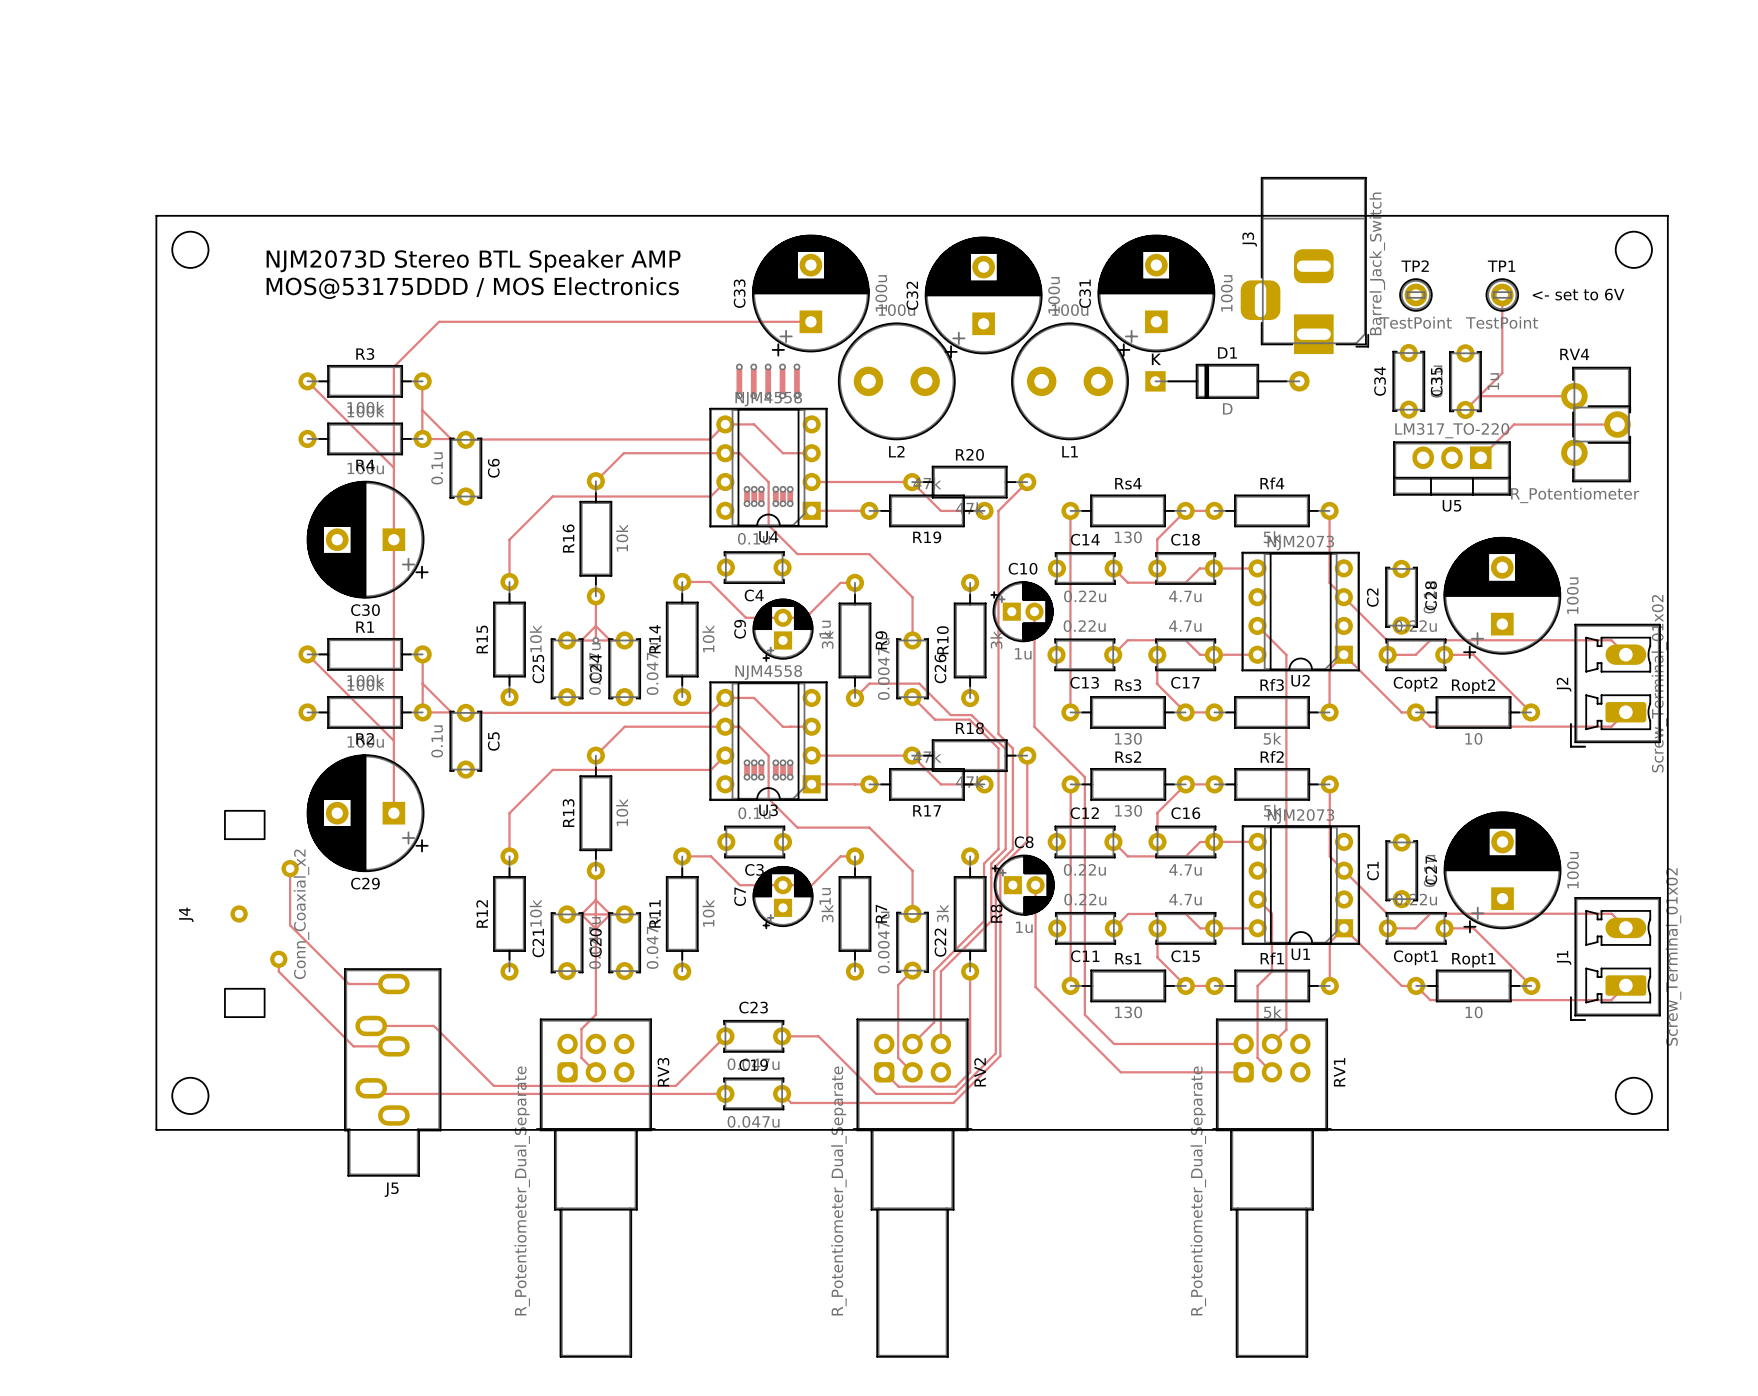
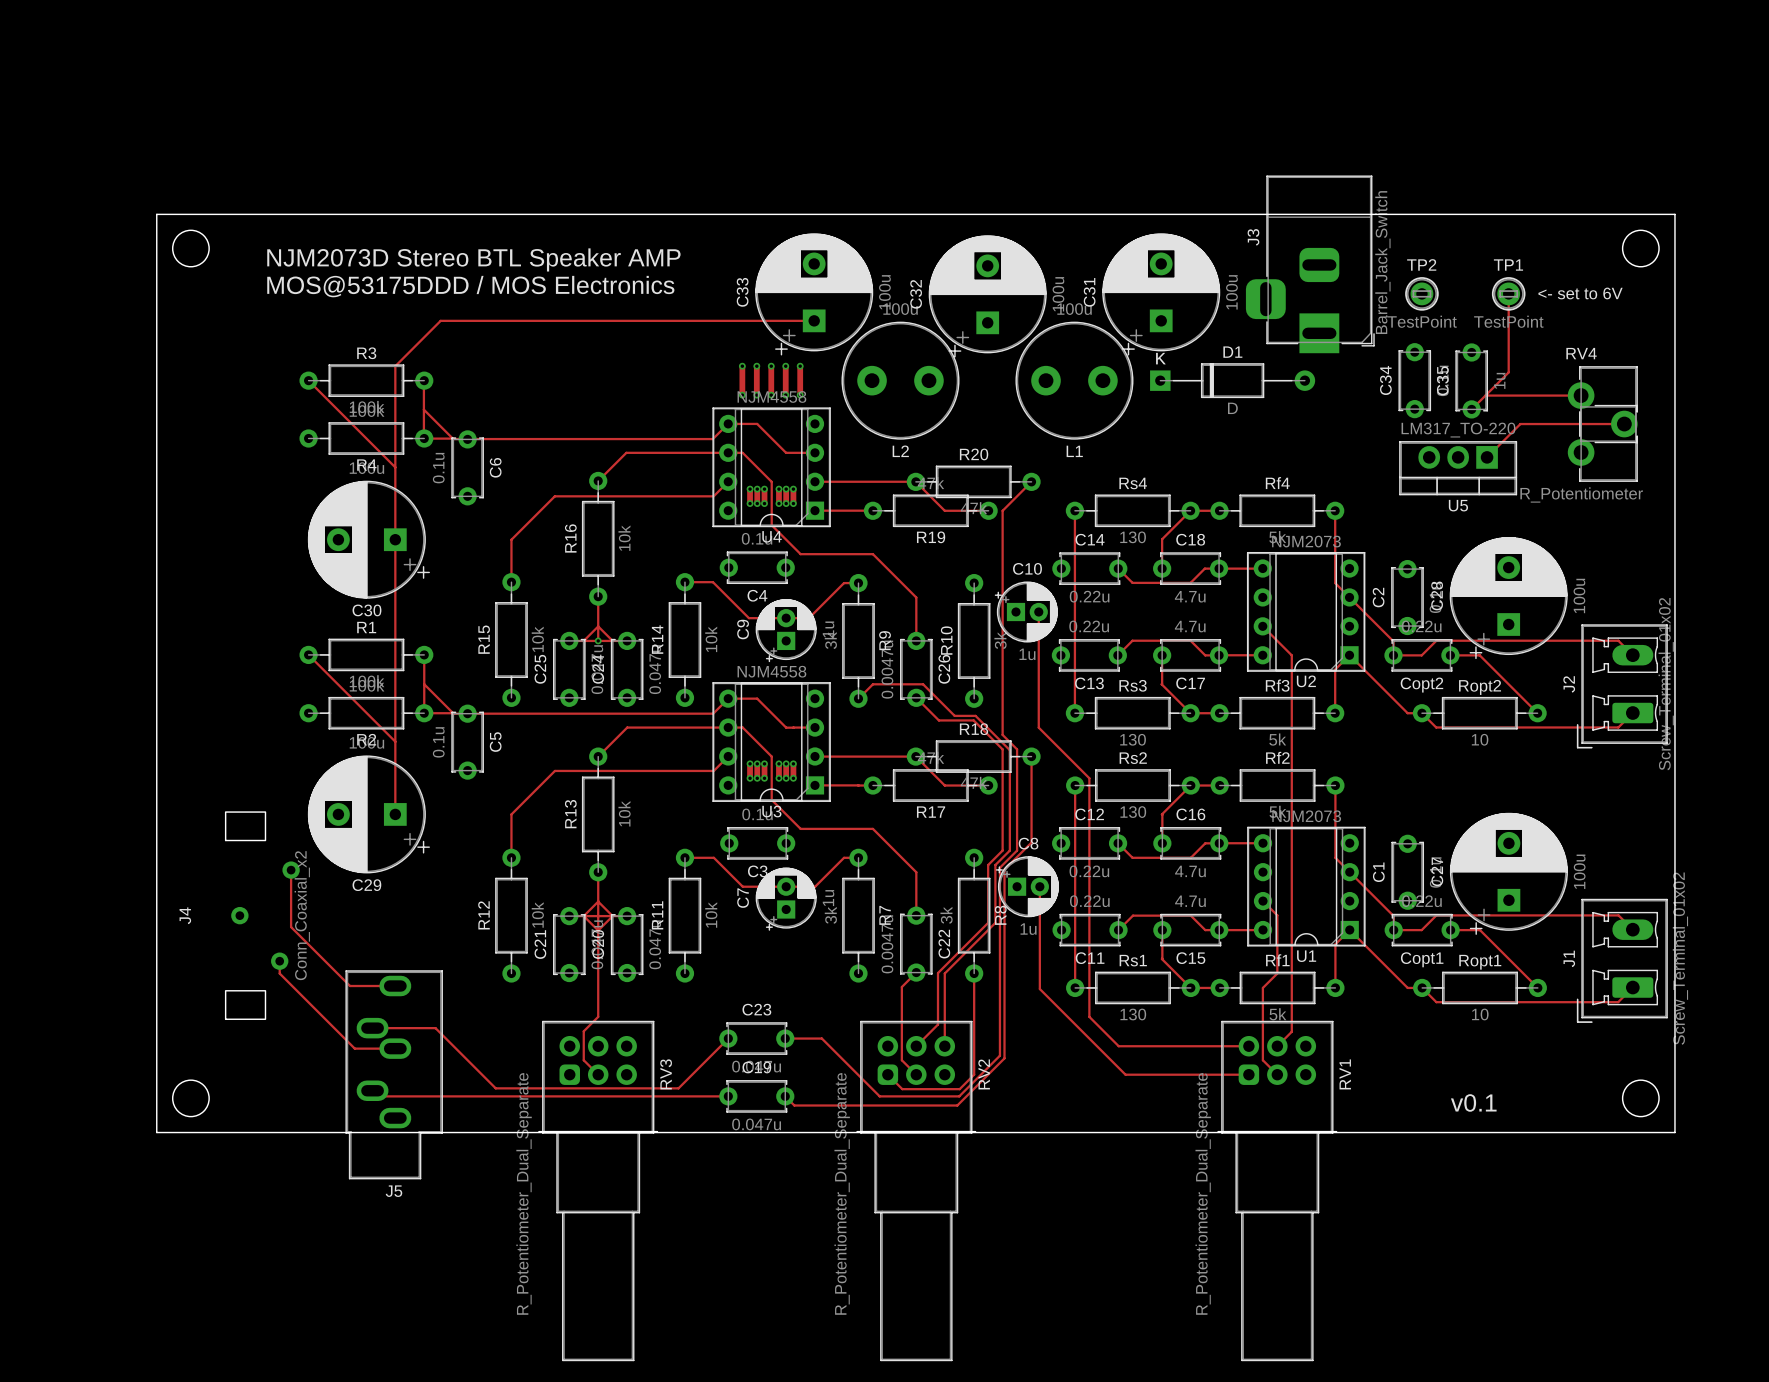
text: none -> v0.1 (1473, 1102)

